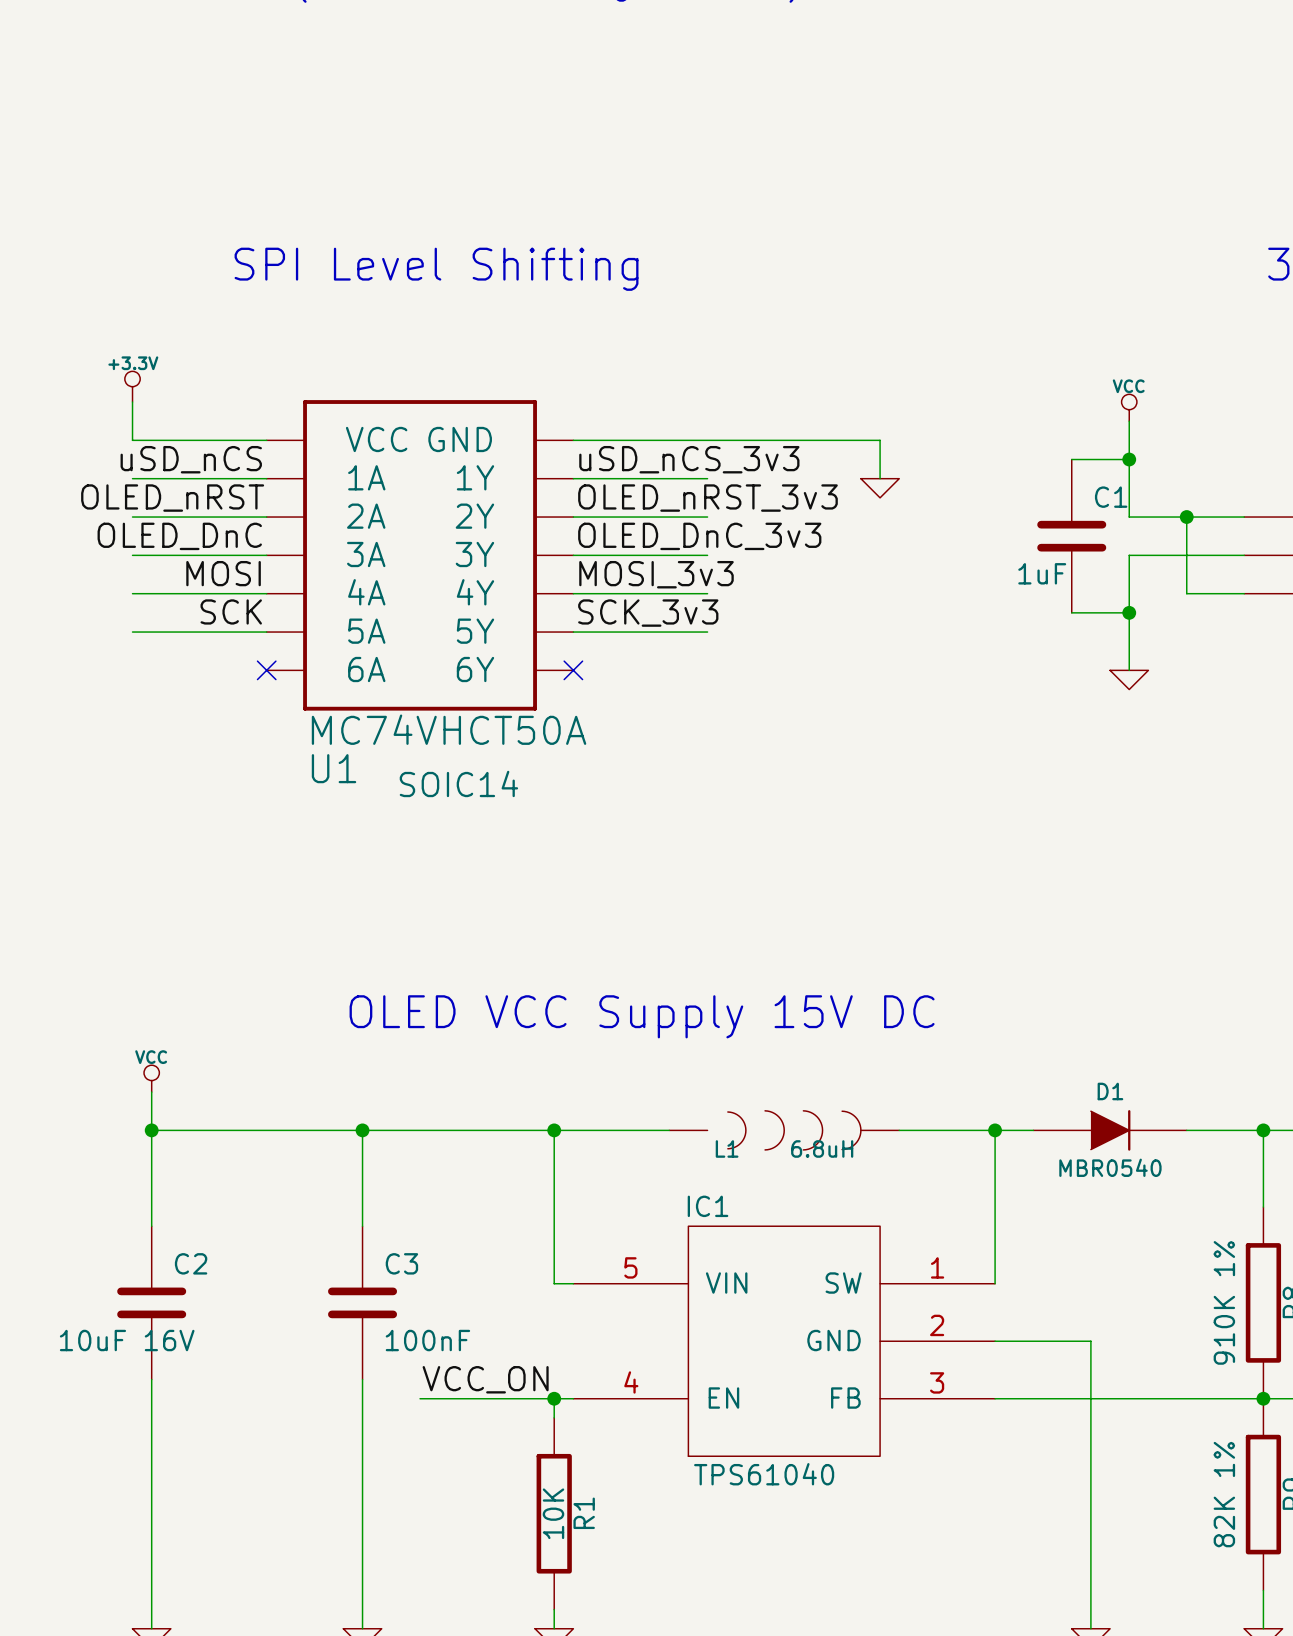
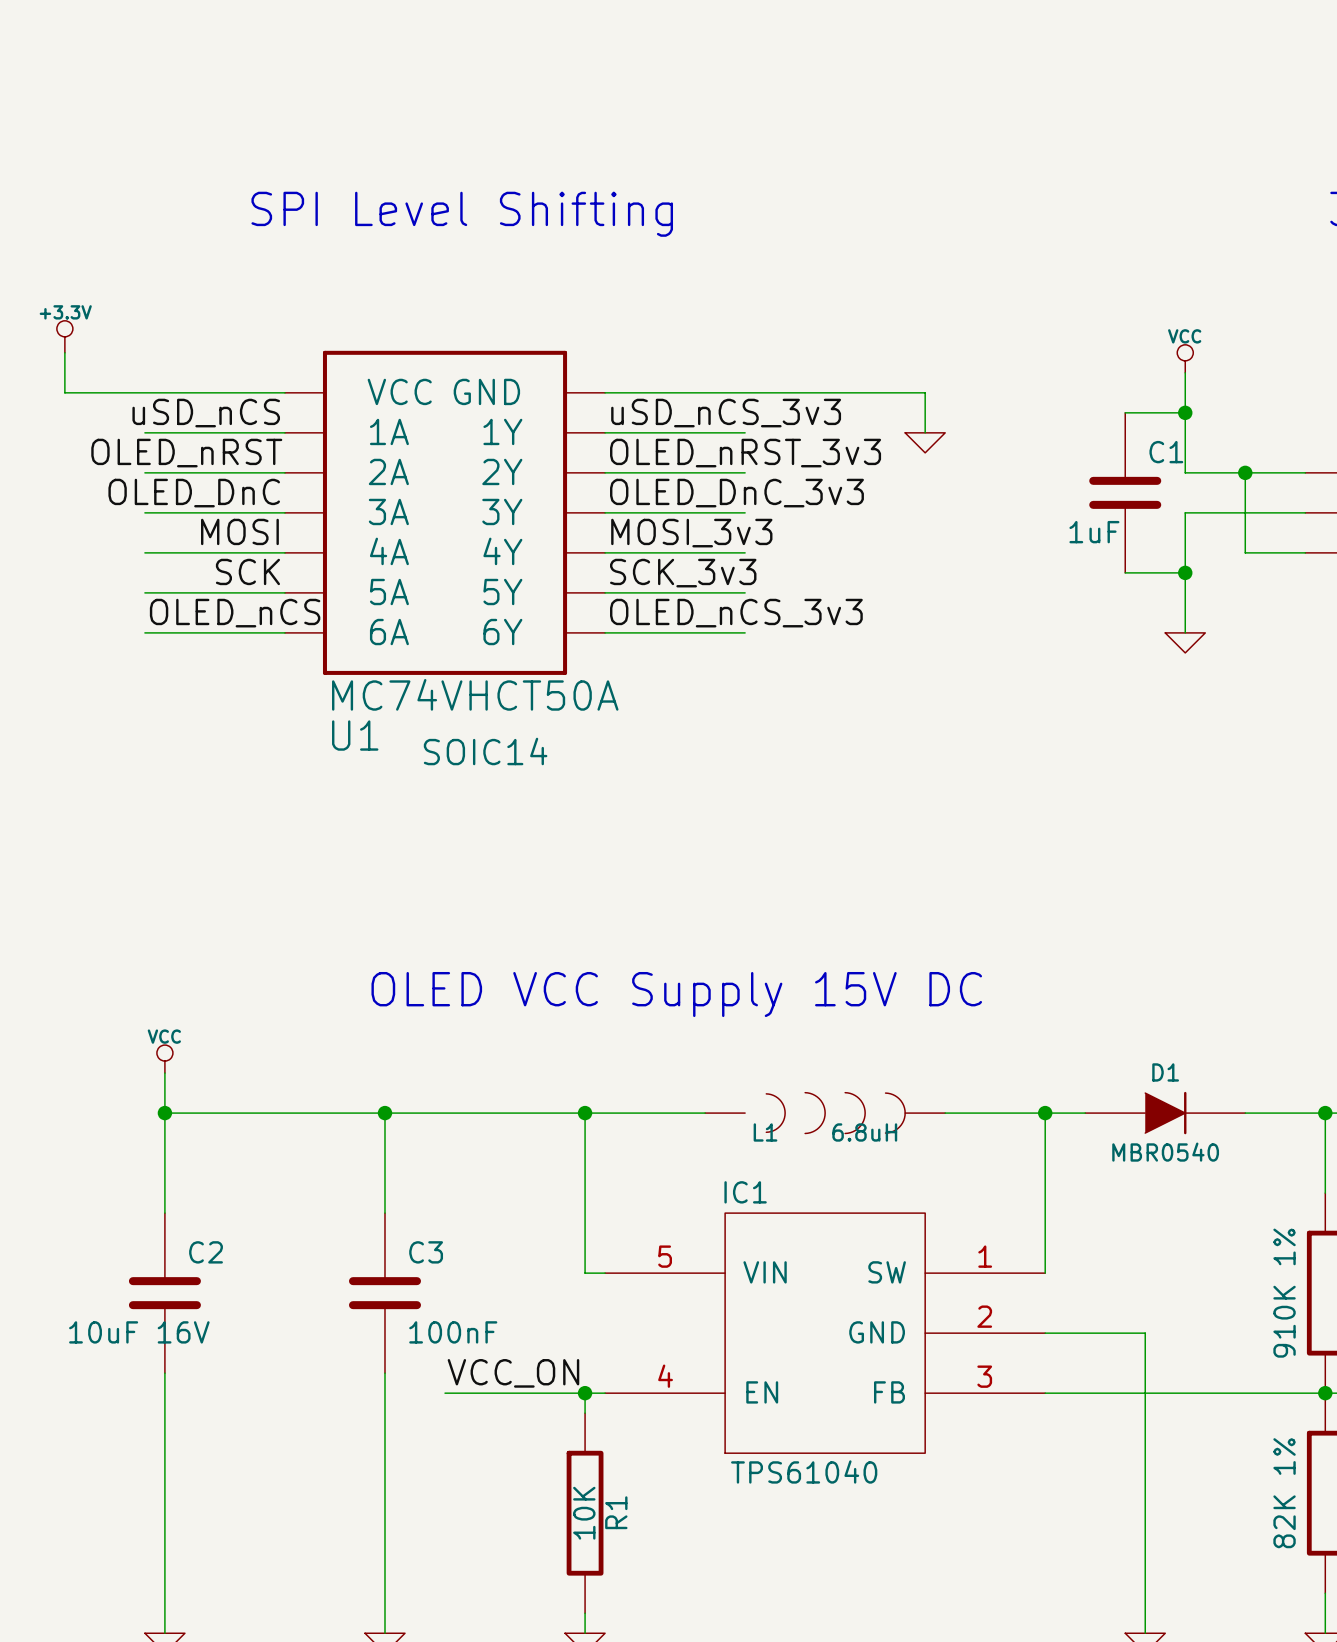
power symbol position: +3.3V (132, 386) -> +3.3V (64, 336)
wire: (132, 402) (132, 440) -> (64, 352) (64, 392) (144, 392)
label: none -> OLED_nCS (235, 613)
label: none -> OLED_nCS_3v3 (736, 613)
wire: none -> (144, 632) (284, 632)
no-connect mark: (266, 670) -> none
wire: none -> (605, 632) (745, 632)
no-connect mark: (573, 670) -> none

